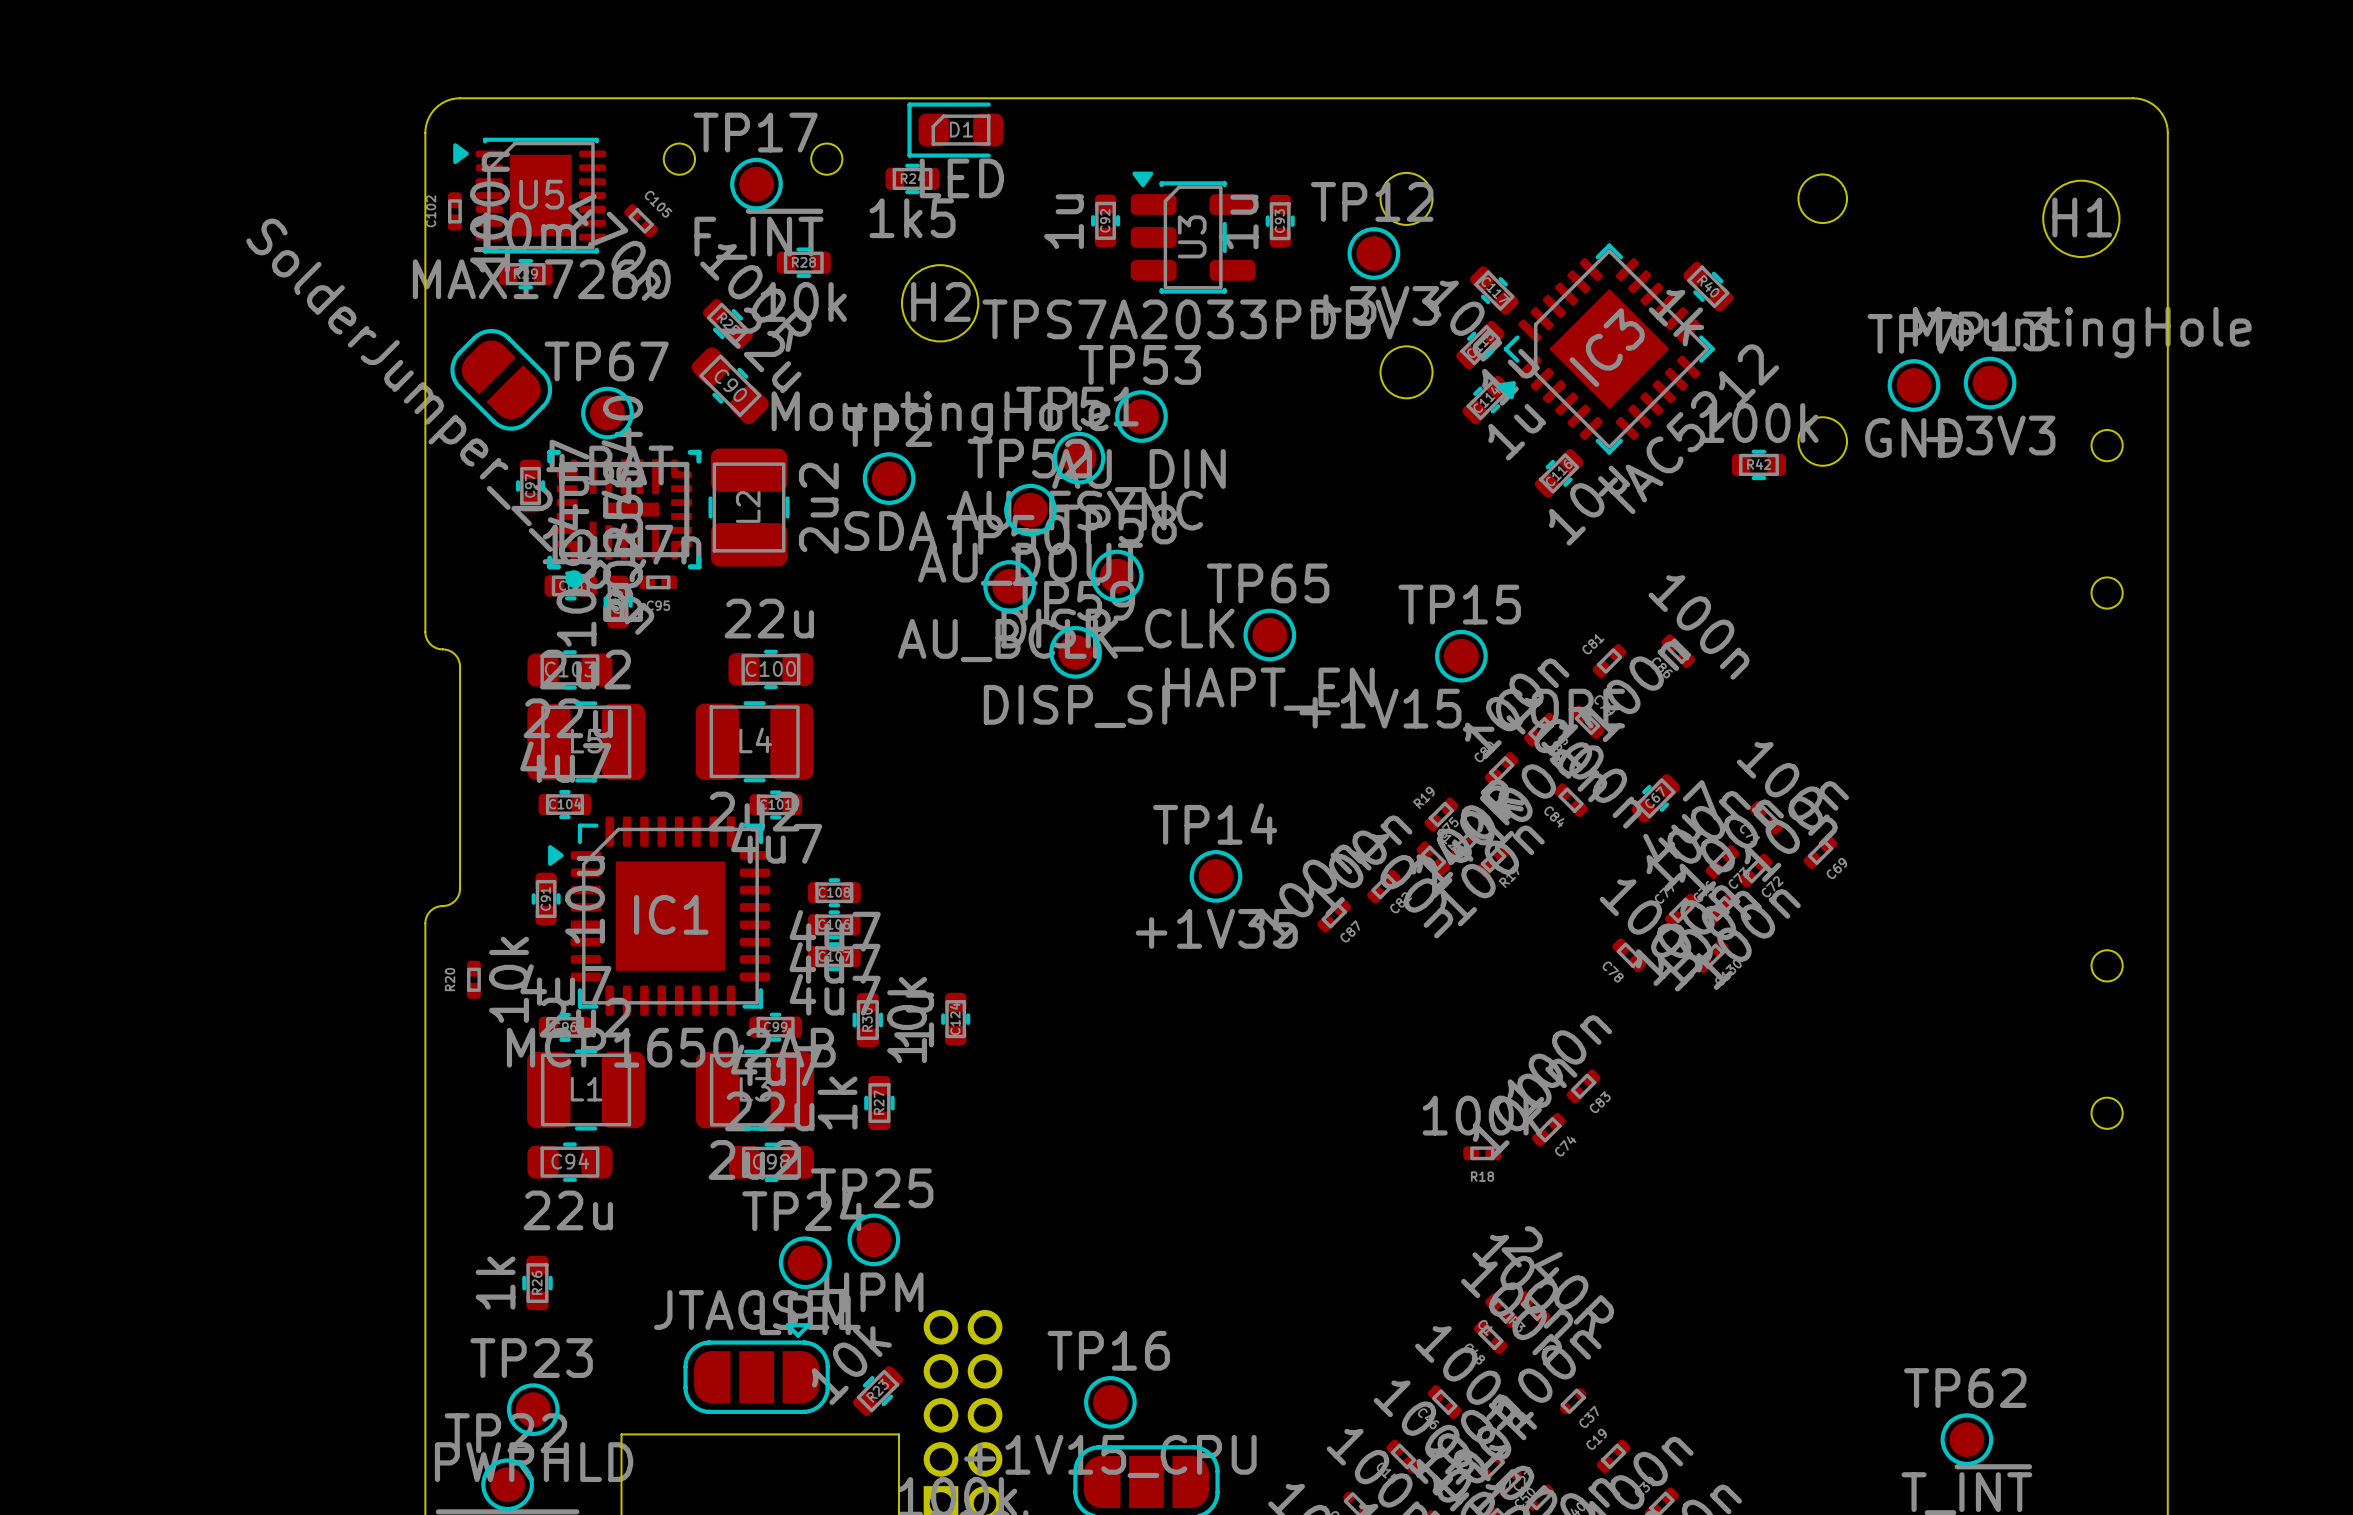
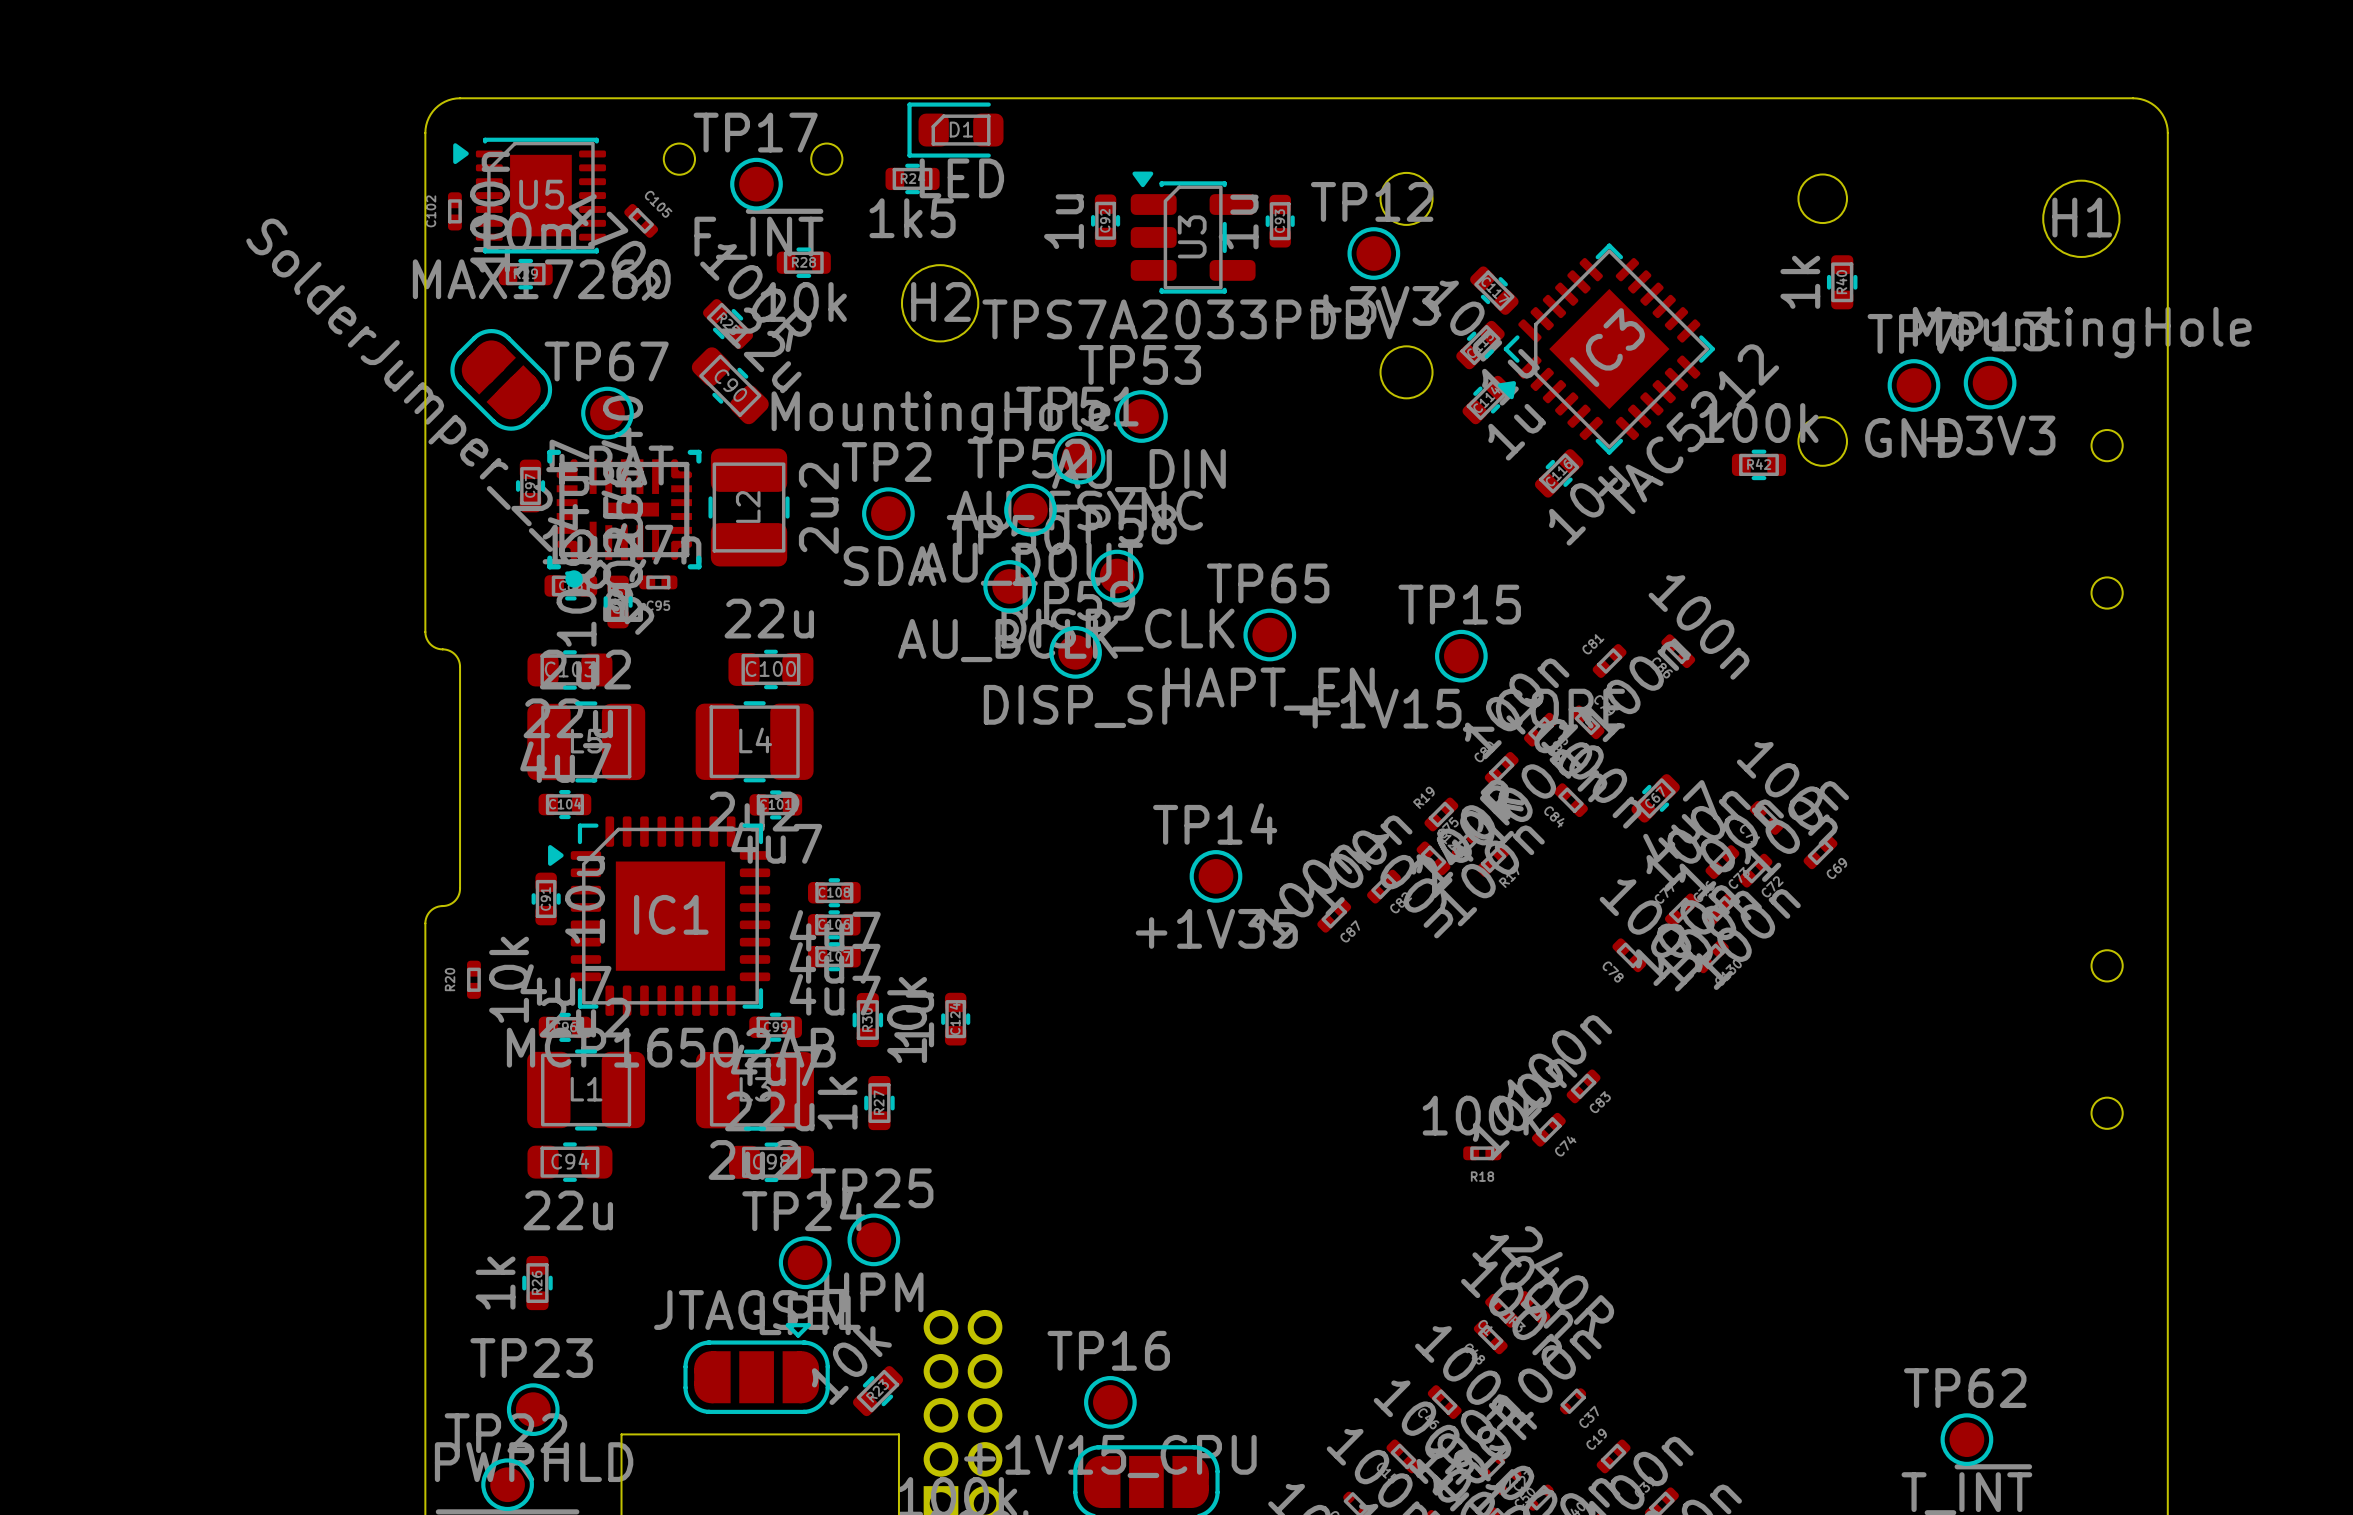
R40 rotation: 0° (1708, 286) -> 45° clockwise (1842, 282)
R40 position: (1708, 286) -> (1842, 282)
TP2 position: (889, 478) -> (888, 513)

